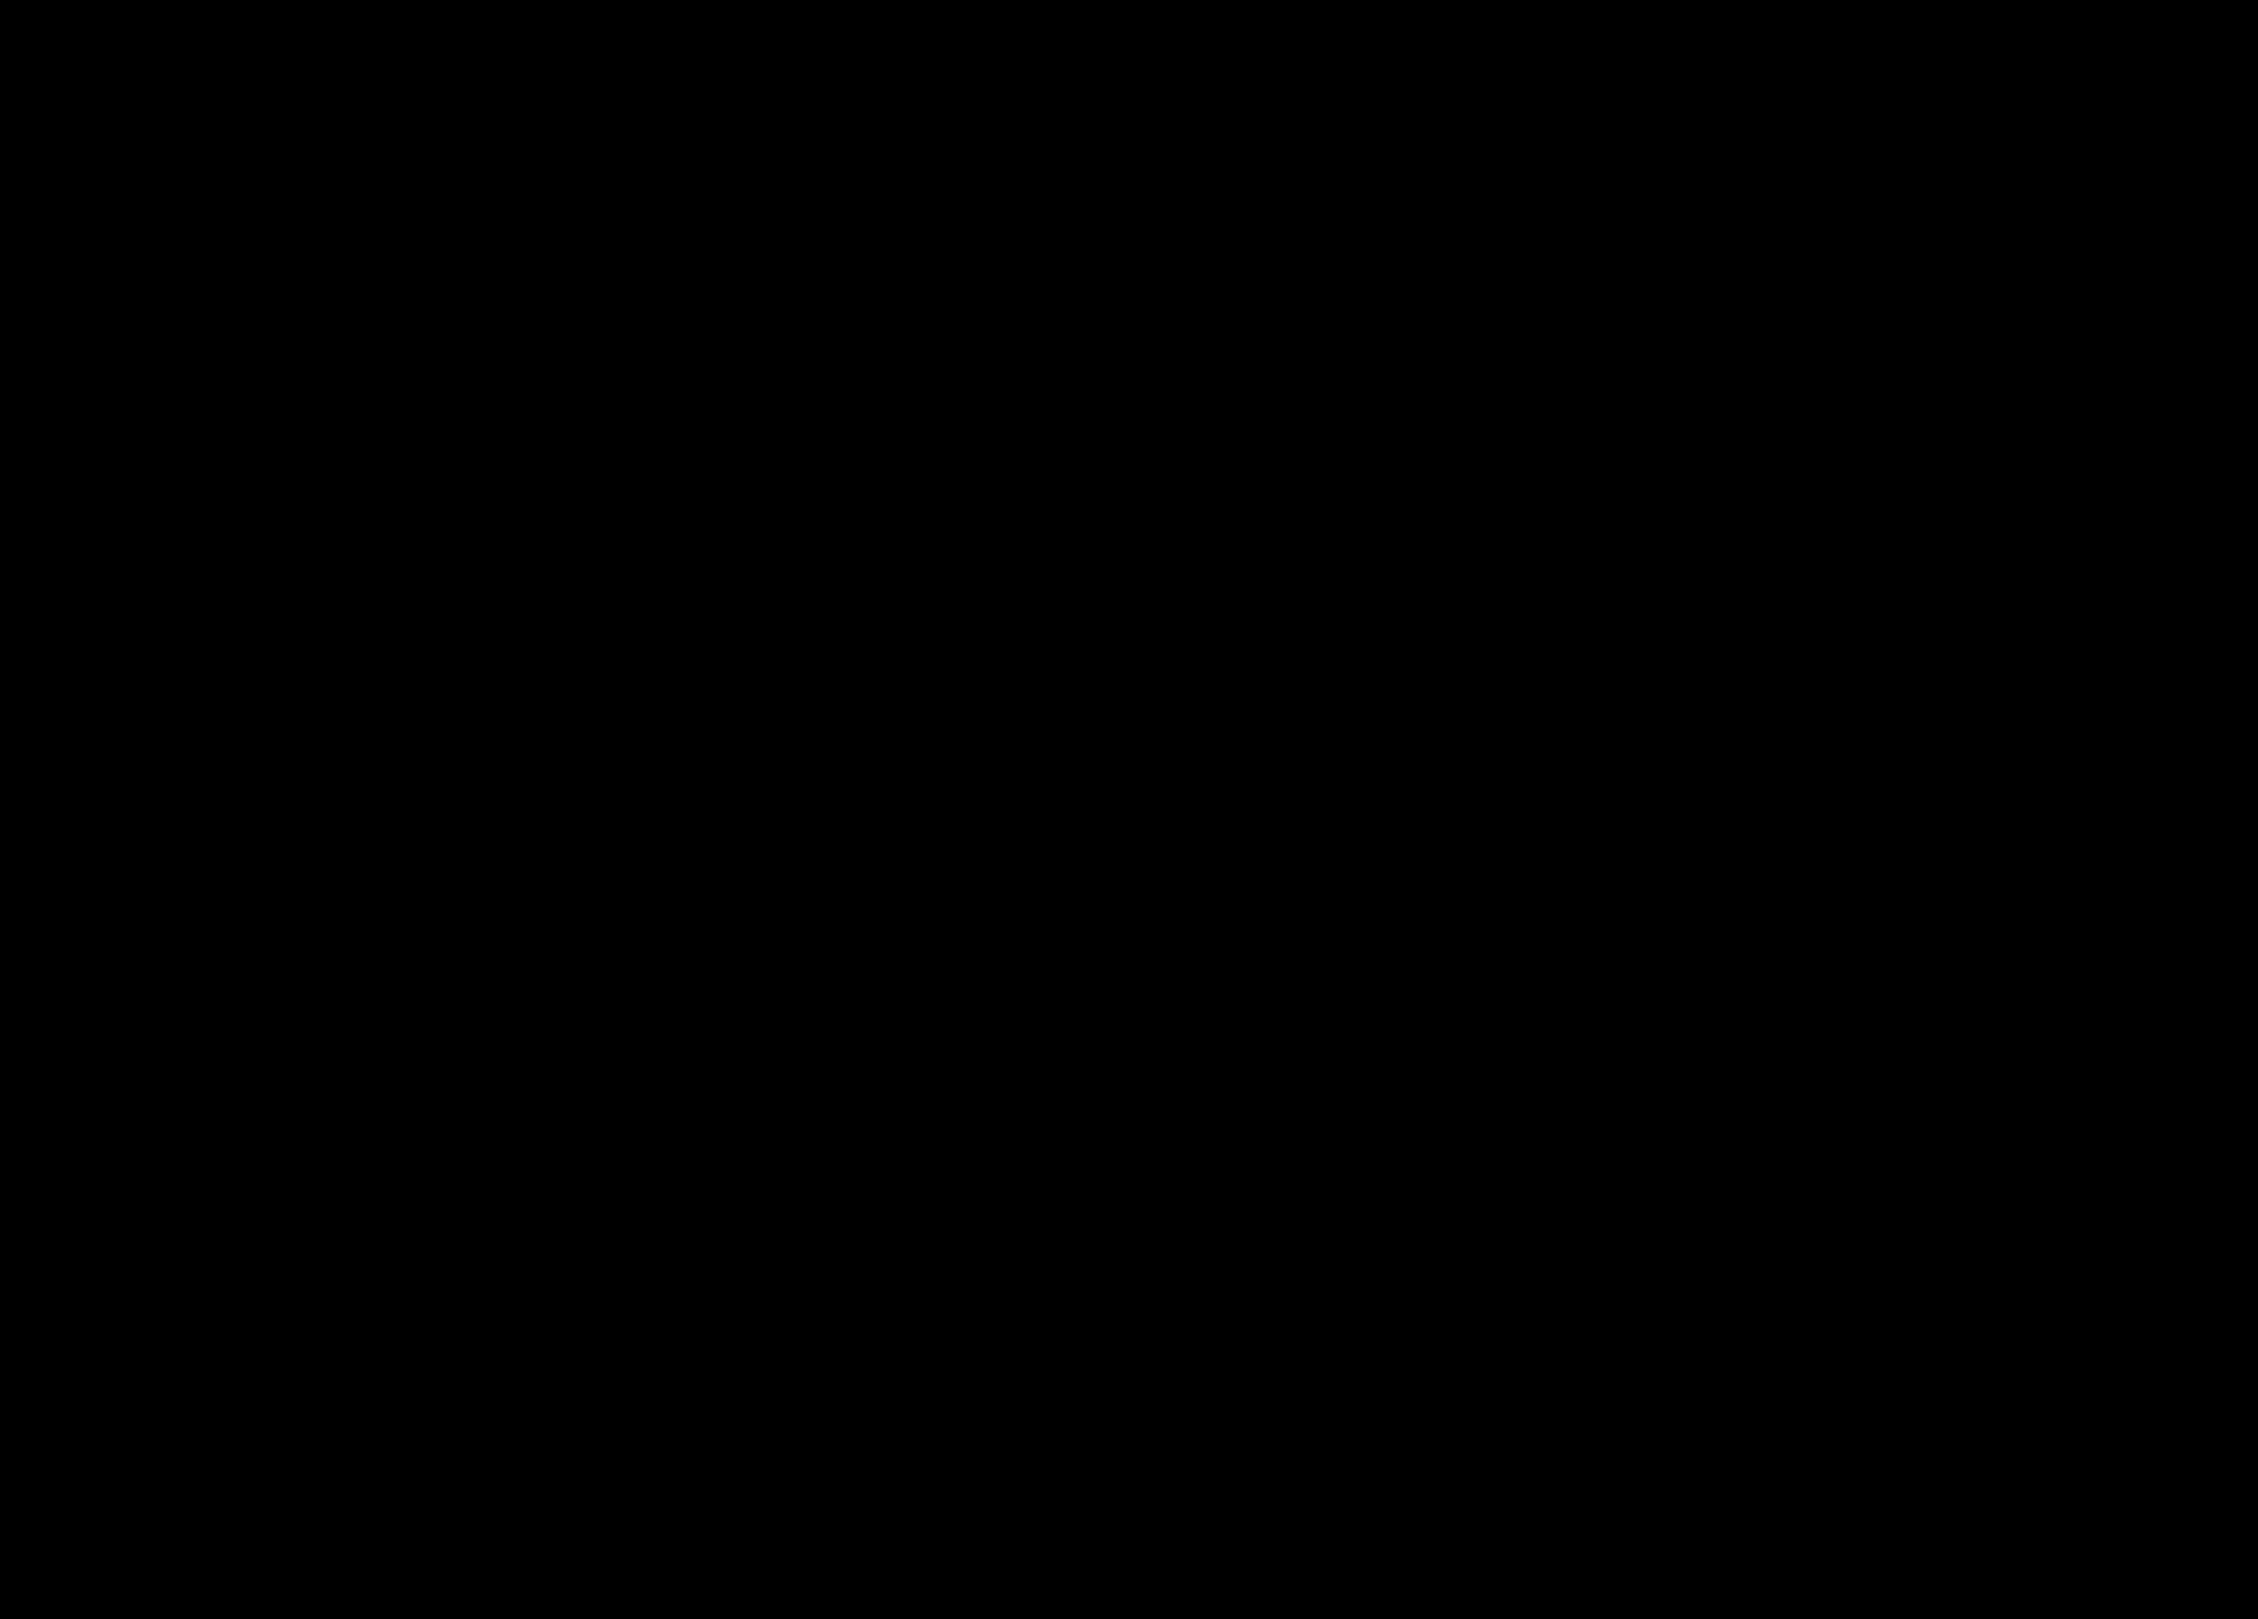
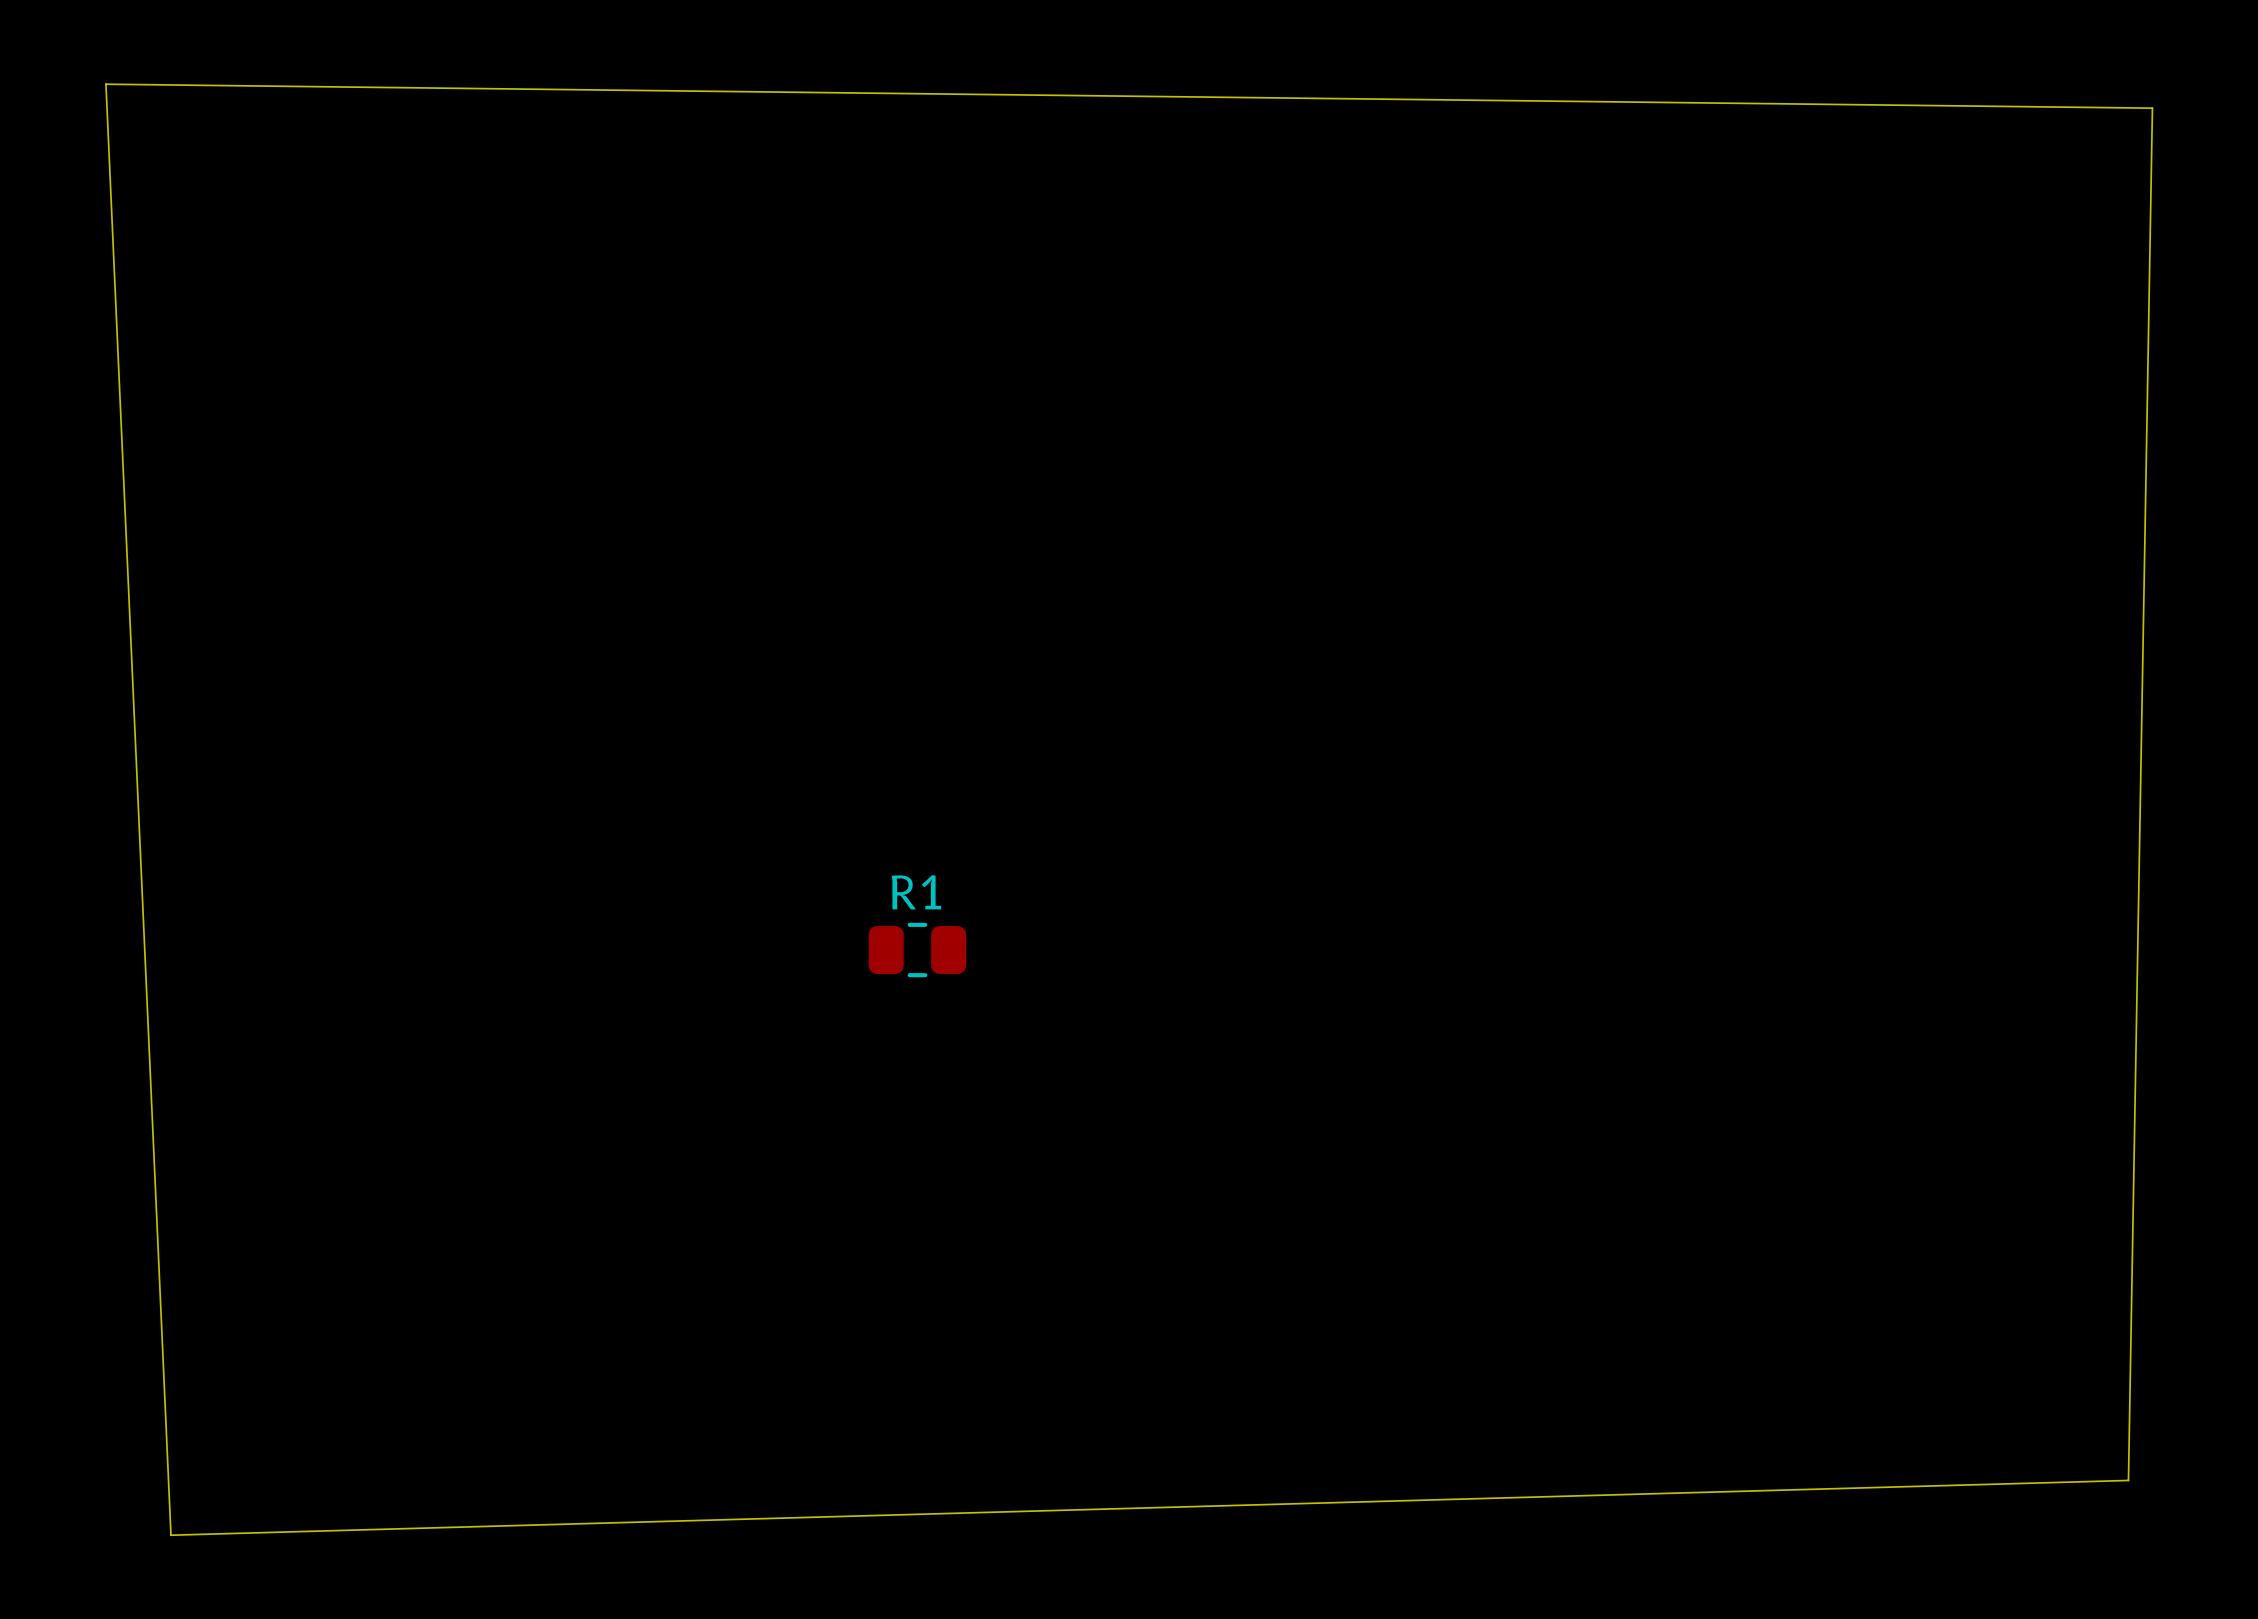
board edge: none -> (105, 84) (2152, 108) (2128, 1480) (170, 1535) (105, 84)
R1: none -> (917, 950)

